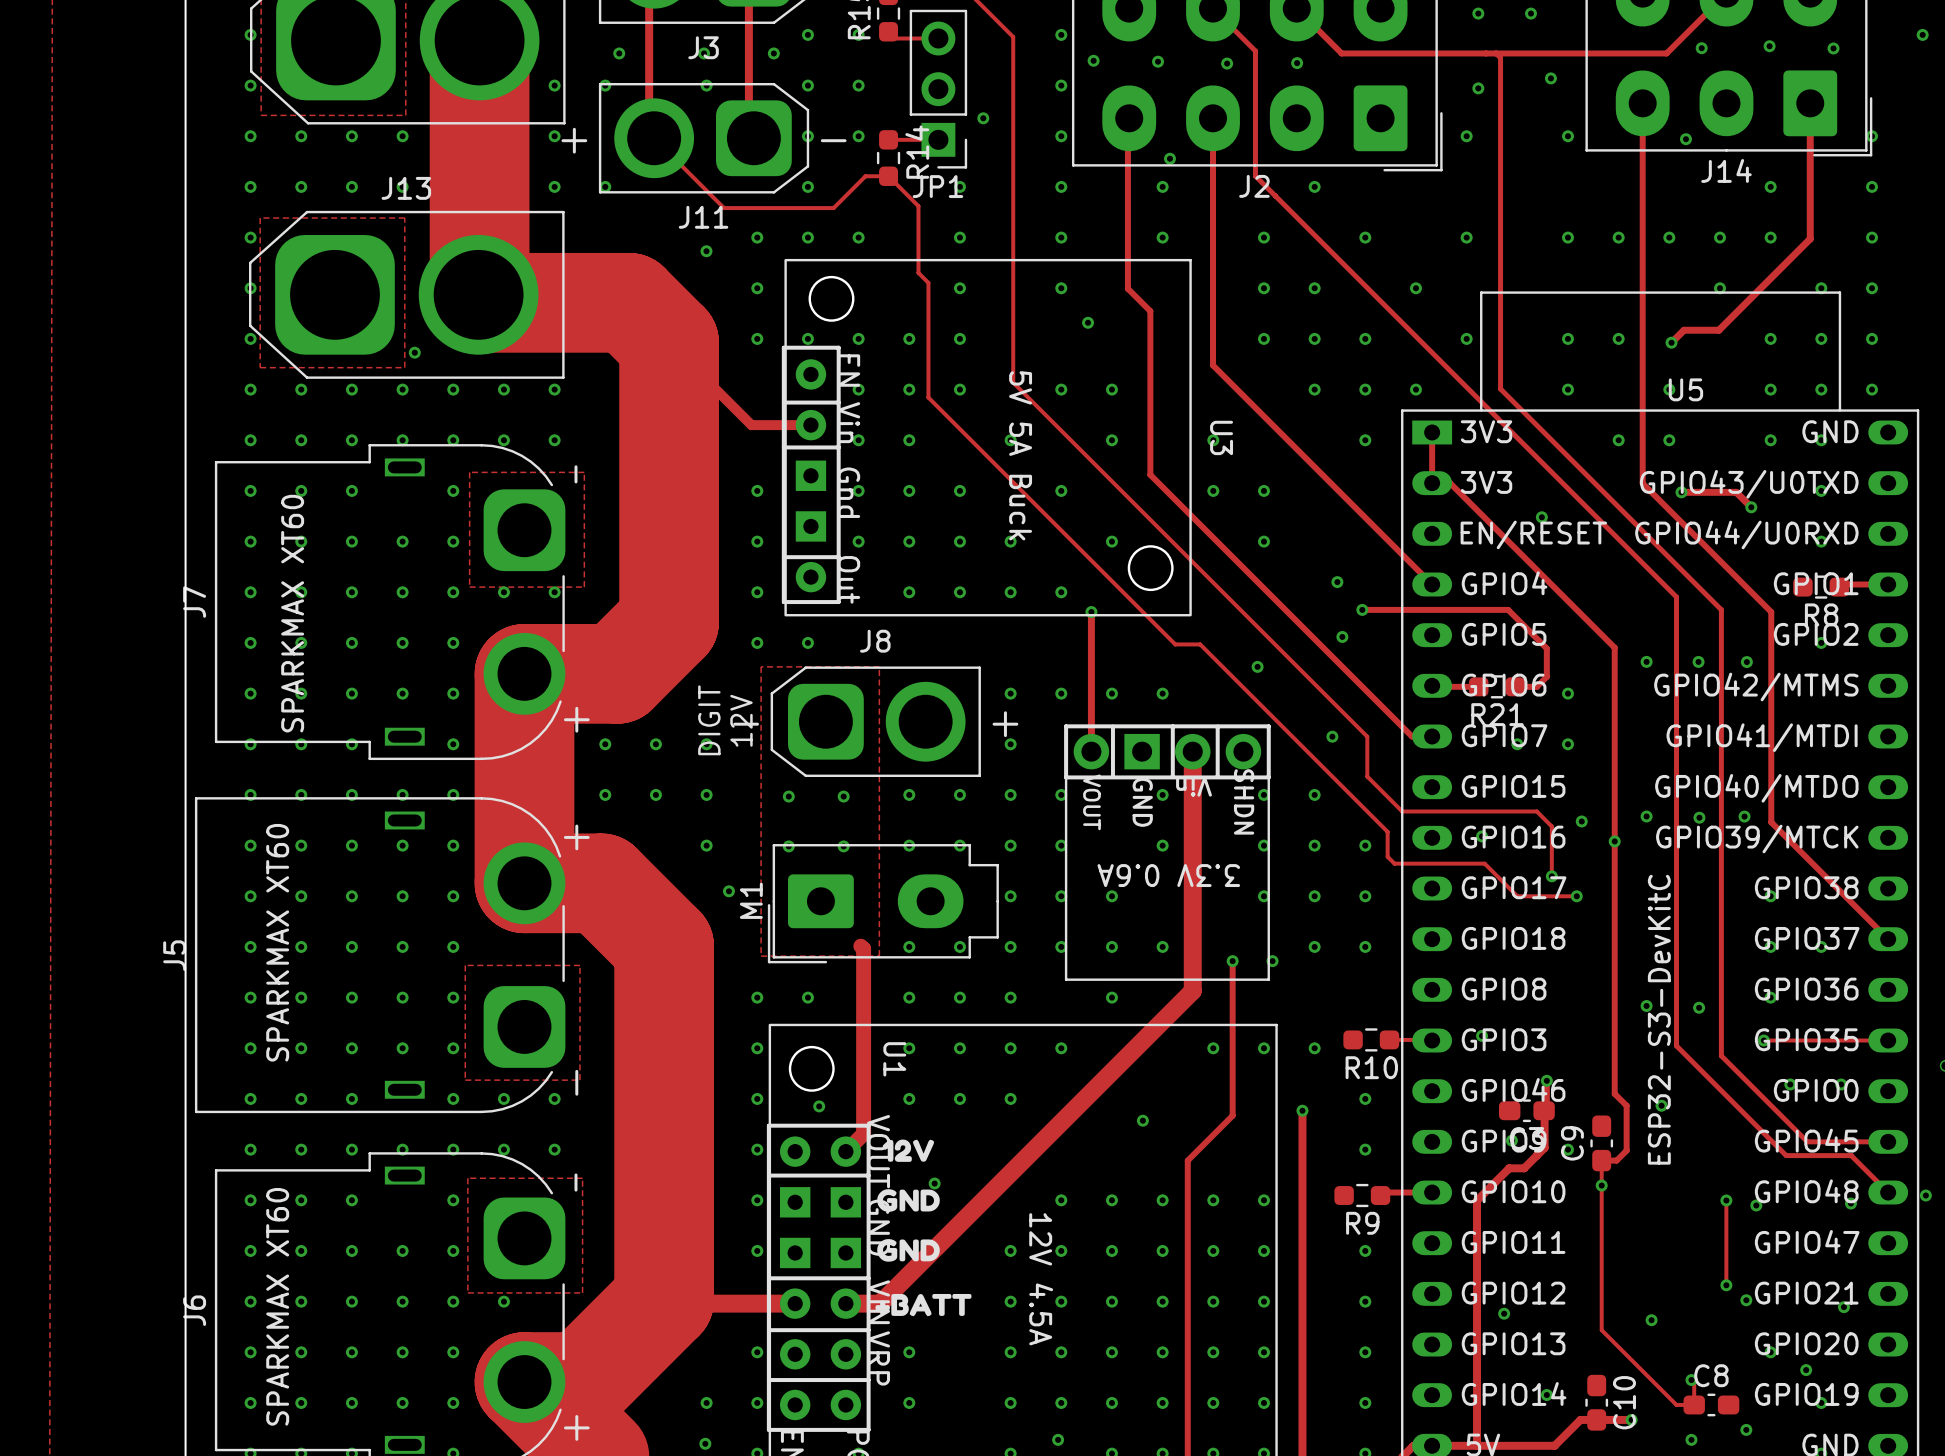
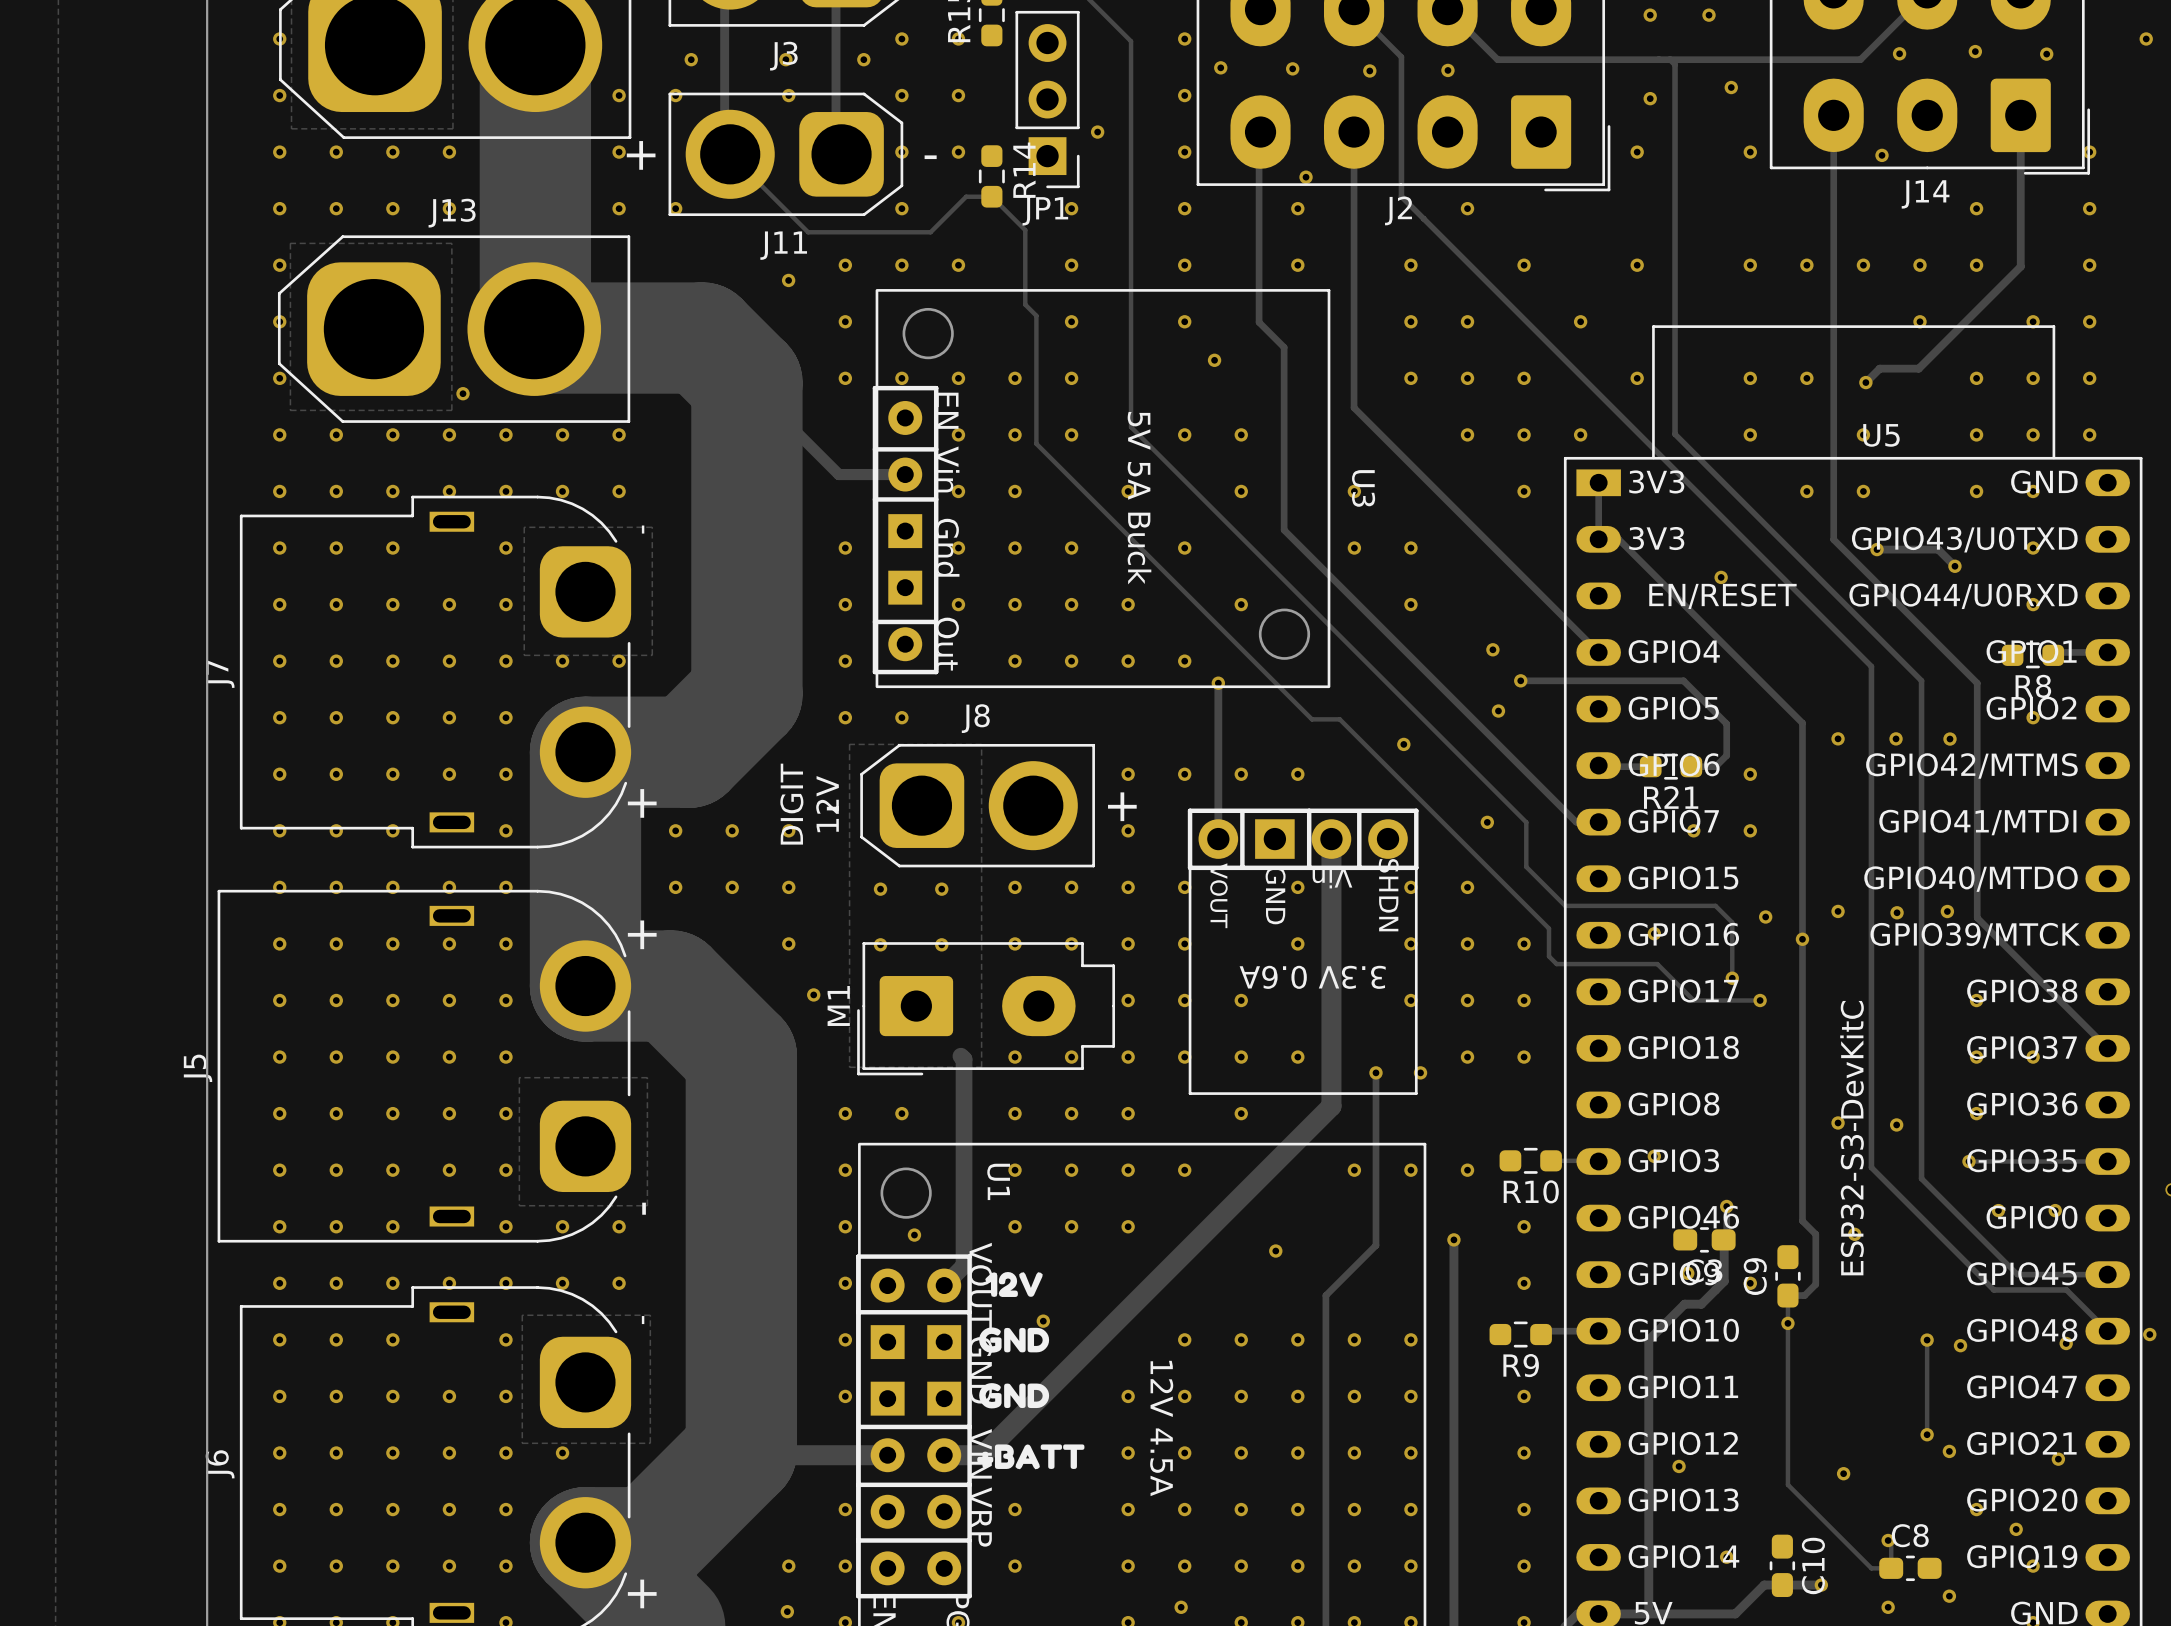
track: (888, 31) (895, 38) (938, 38) -> none
track: (888, 139) (938, 139) -> none
text: SPARKMAX XT60 (292, 613) -> none
text: SPARKMAX XT60 (277, 942) -> none
text: SPARKMAX XT60 (277, 1306) -> none

